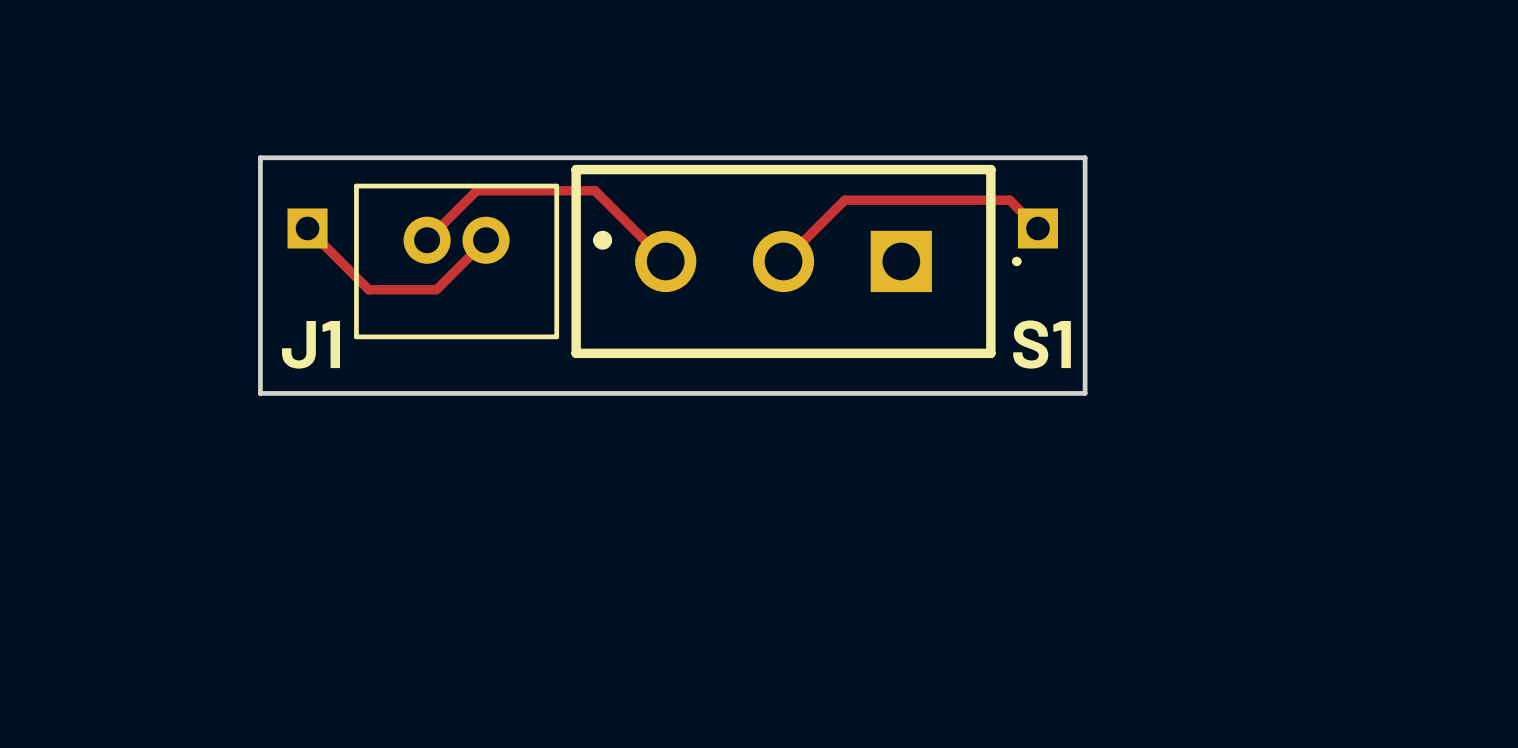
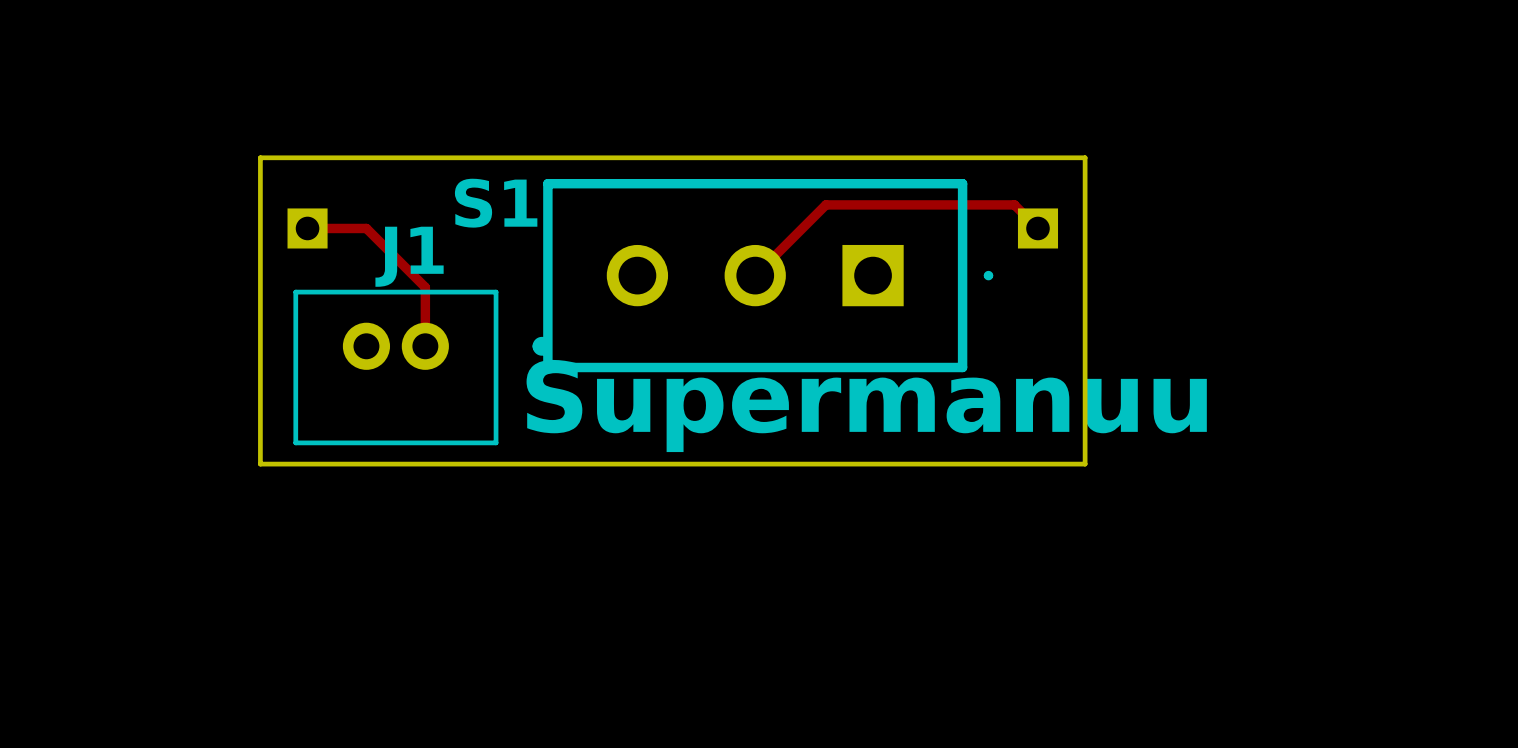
track: (1014, 204) (1009, 200) (844, 200) (783, 261) -> (1014, 204) (825, 204) (755, 275)
track: (307, 228) (368, 289) (436, 289) (486, 240) -> (307, 228) (366, 228) (425, 287) (425, 346)
track: (427, 240) (476, 190) (595, 190) (665, 261) -> none
J1 position: (483, 261) -> (422, 367)
S1 position: (796, 261) -> (768, 275)
J1 name position: J1 (311, 344) -> J1 (409, 256)
S1 name position: S1 (1042, 344) -> S1 (496, 203)
board edge: (260, 393) (1085, 393) -> (260, 393) (260, 464) (1085, 464) (1085, 393)
text: none -> Supermanuu (866, 405)

